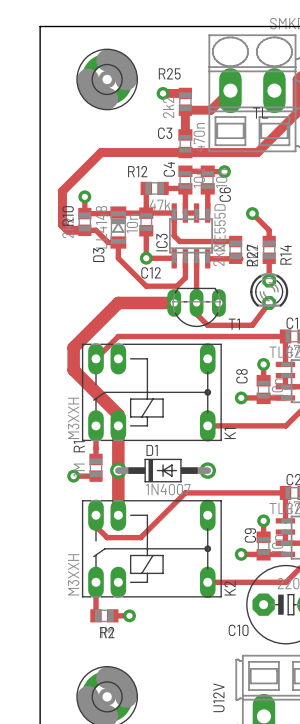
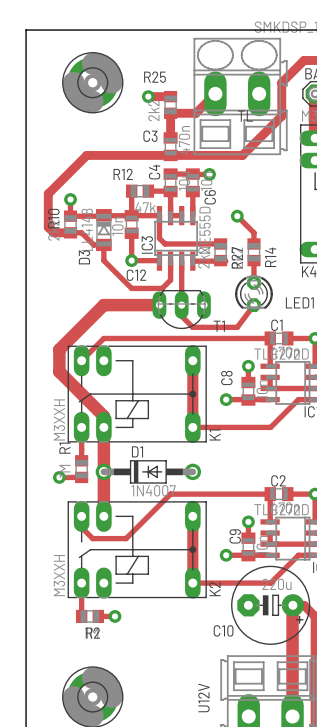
track: none -> (192, 360) (192, 427)
track: none -> (192, 516) (192, 583)

